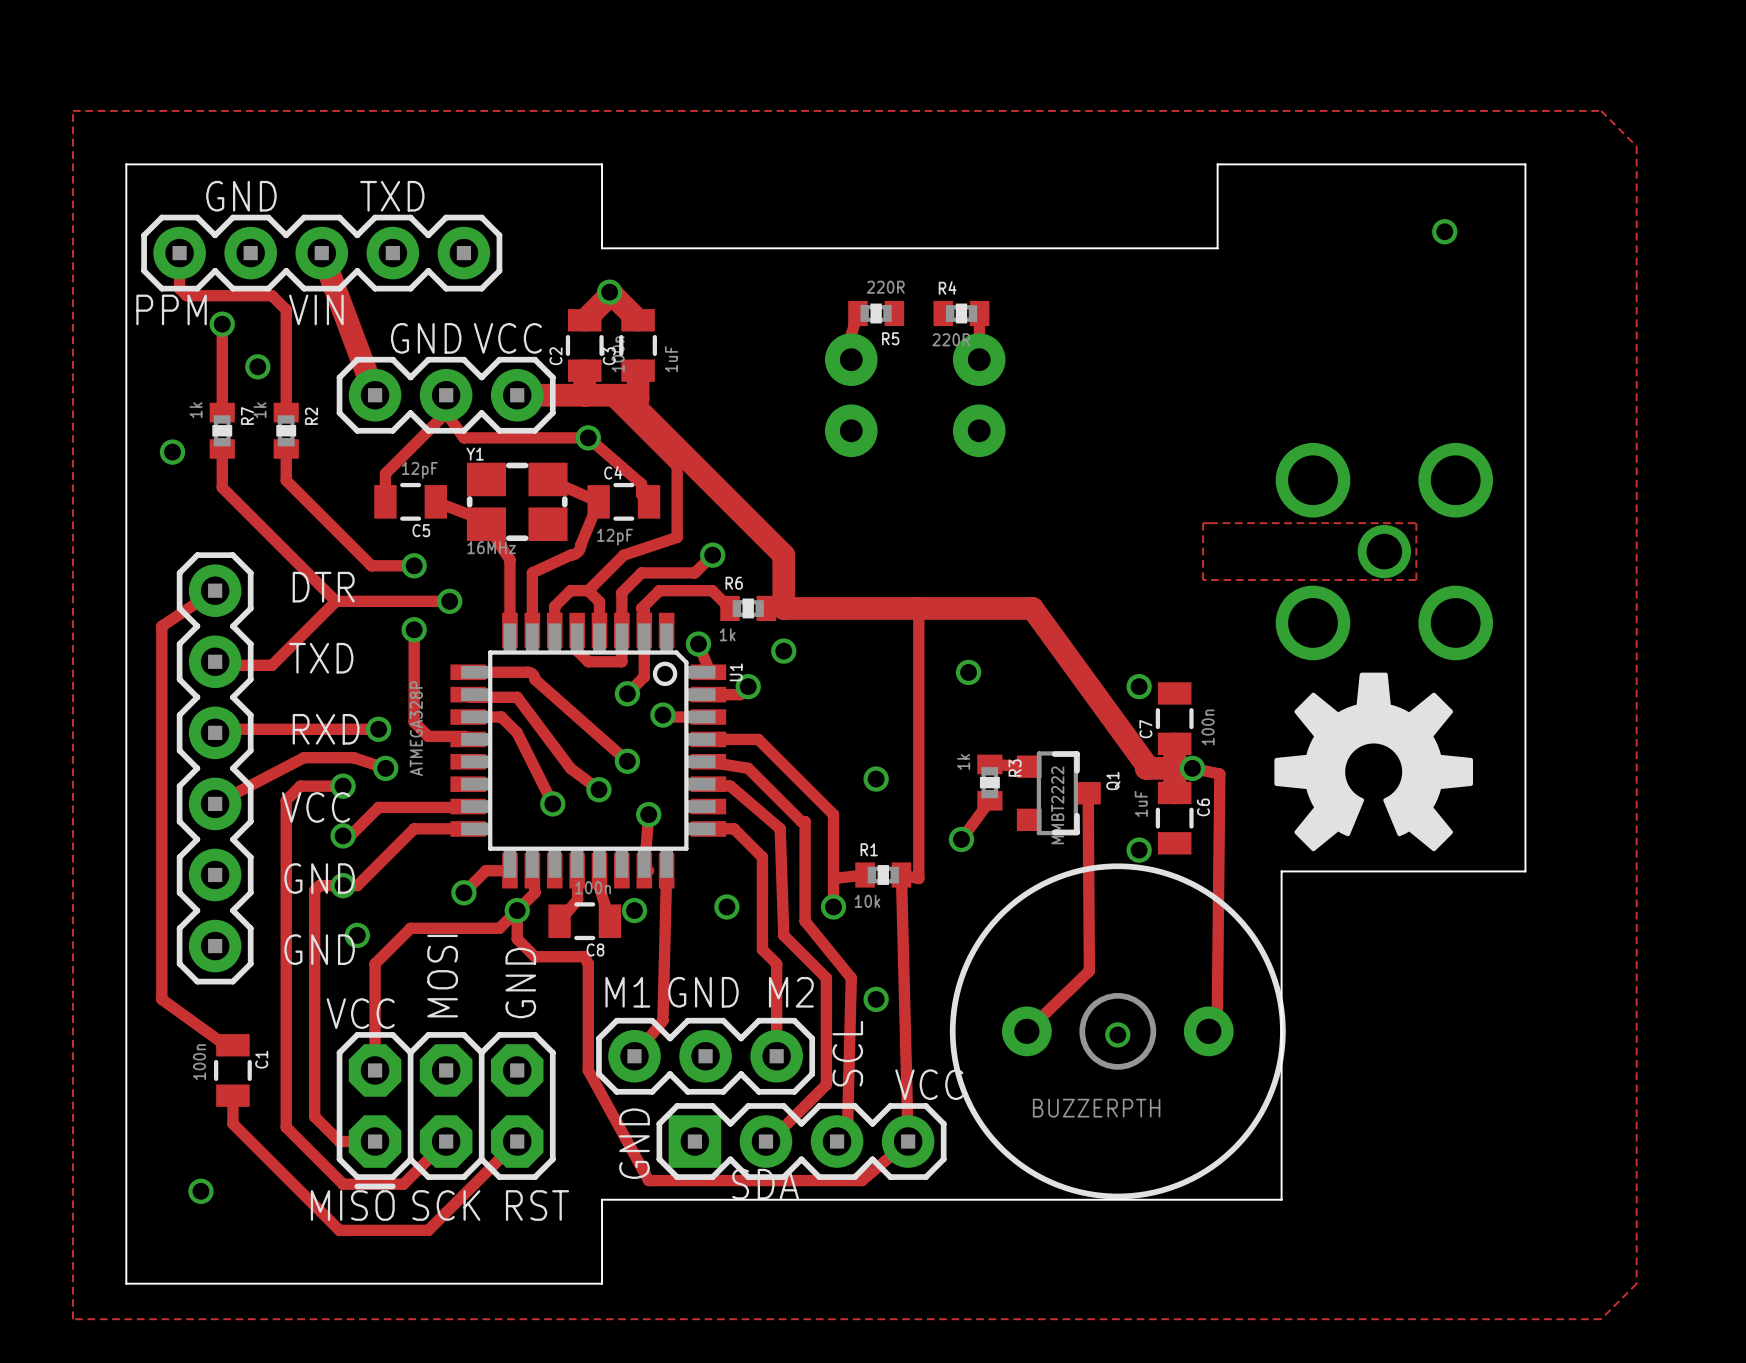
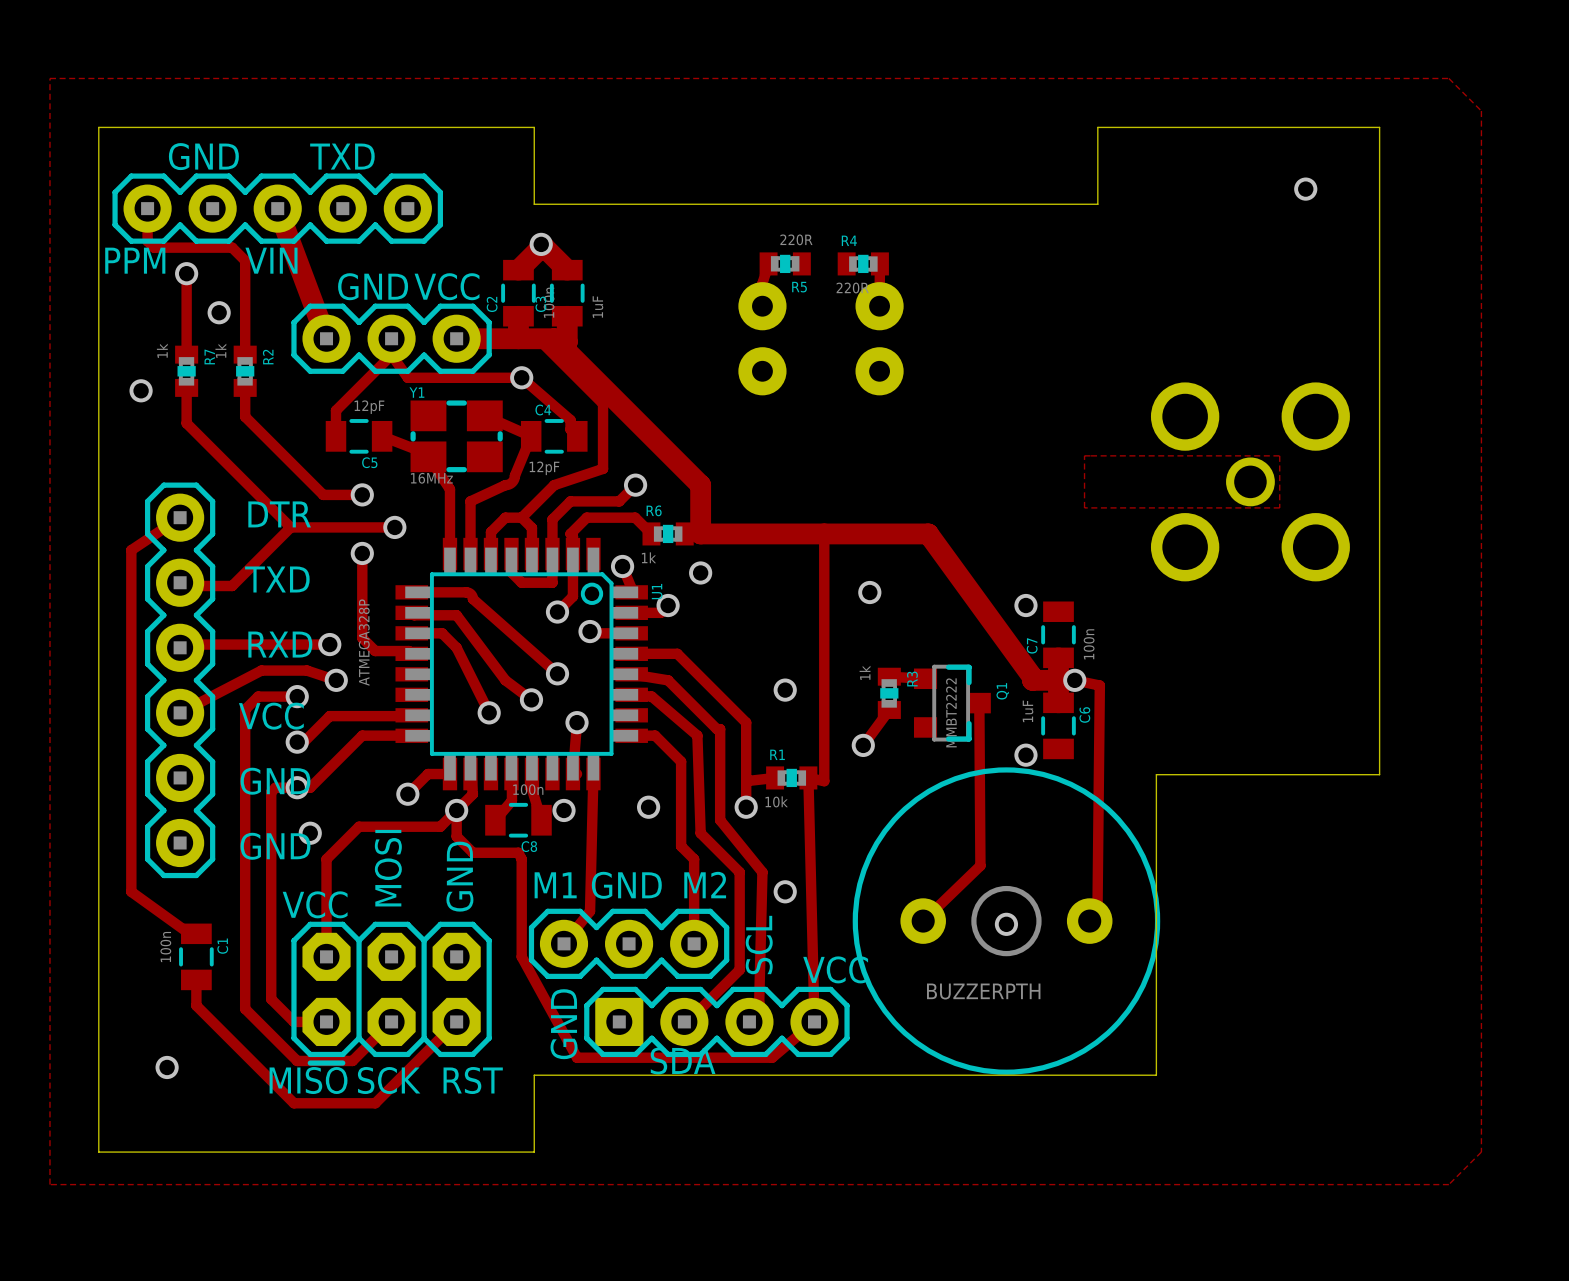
drawing: [1274, 672, 1474, 852] -> none

